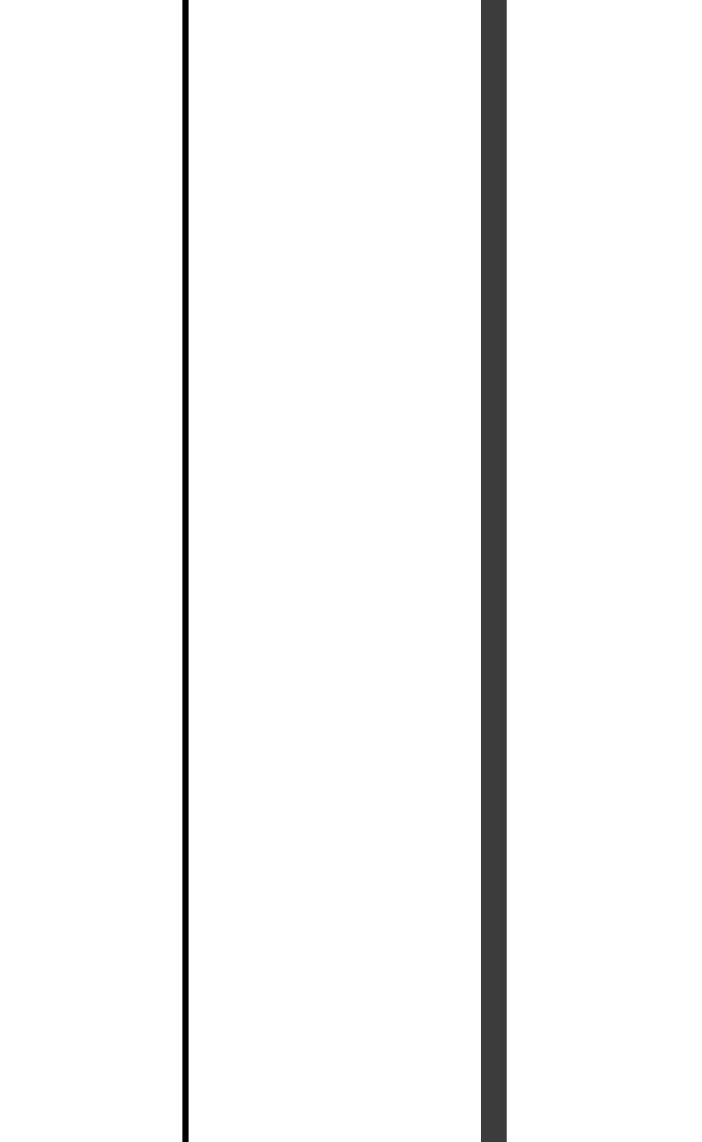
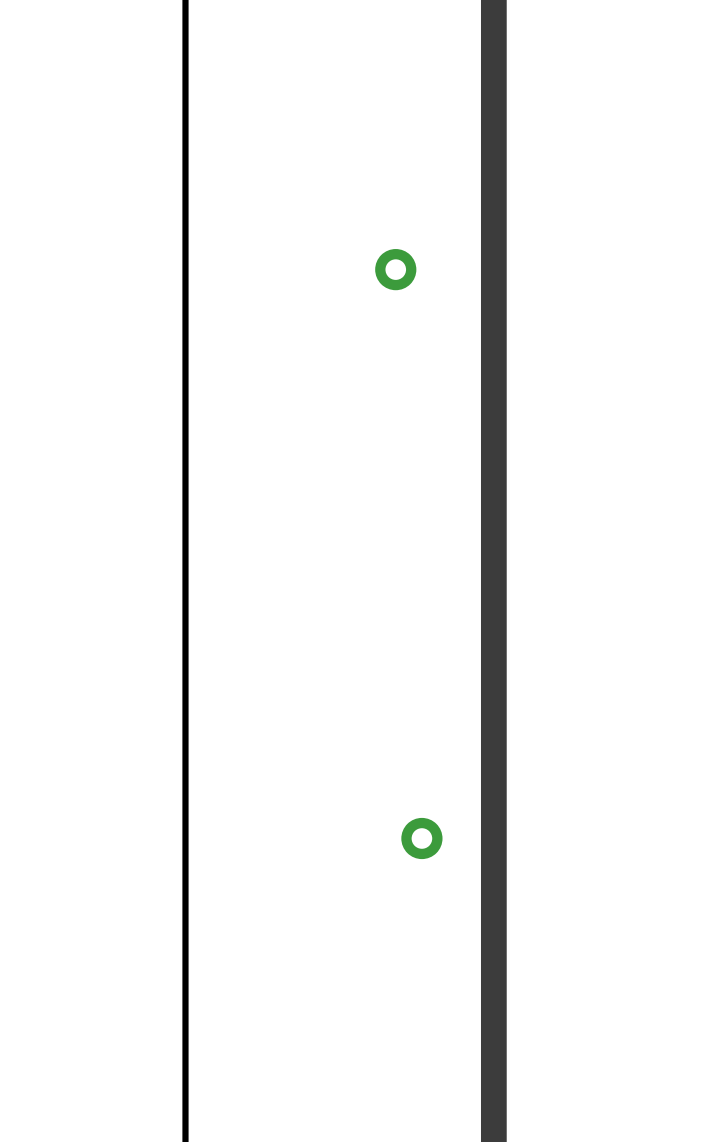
via: none -> (395, 269)
via: none -> (421, 838)

